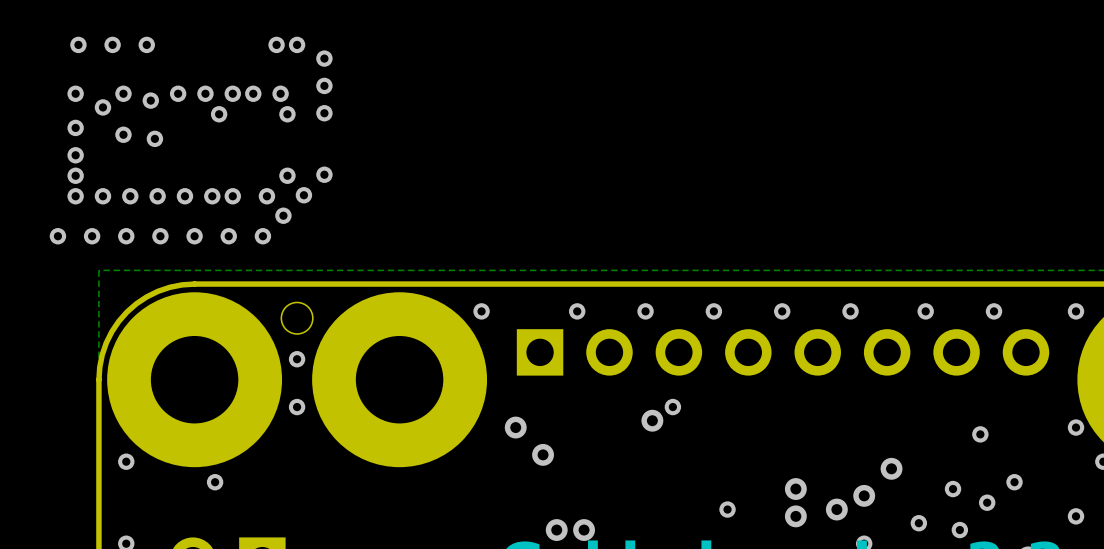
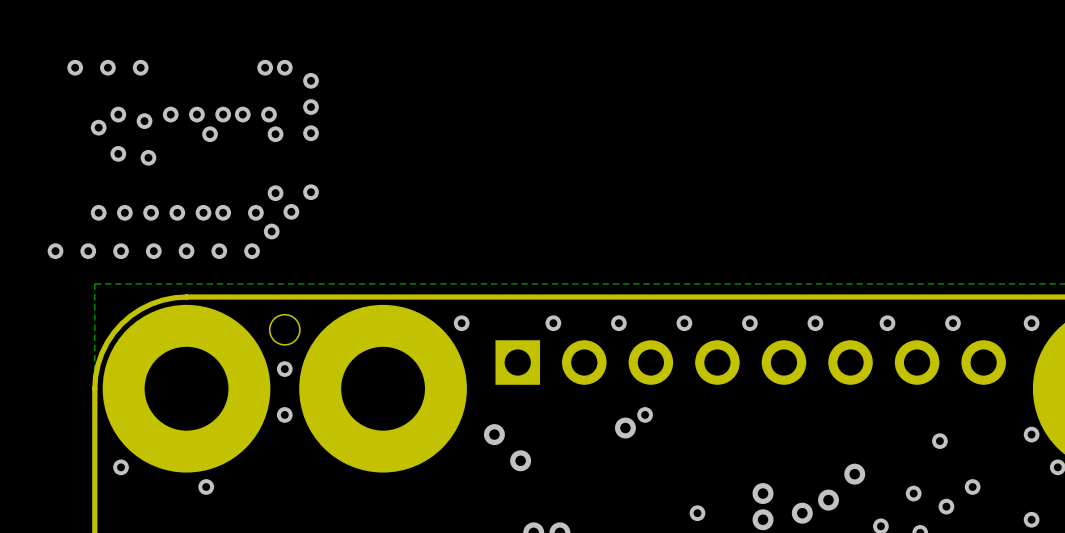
via: (75, 93) -> none
via: (75, 127) -> none
via: (75, 155) -> none
via: (75, 175) -> none
via: (75, 196) -> none

